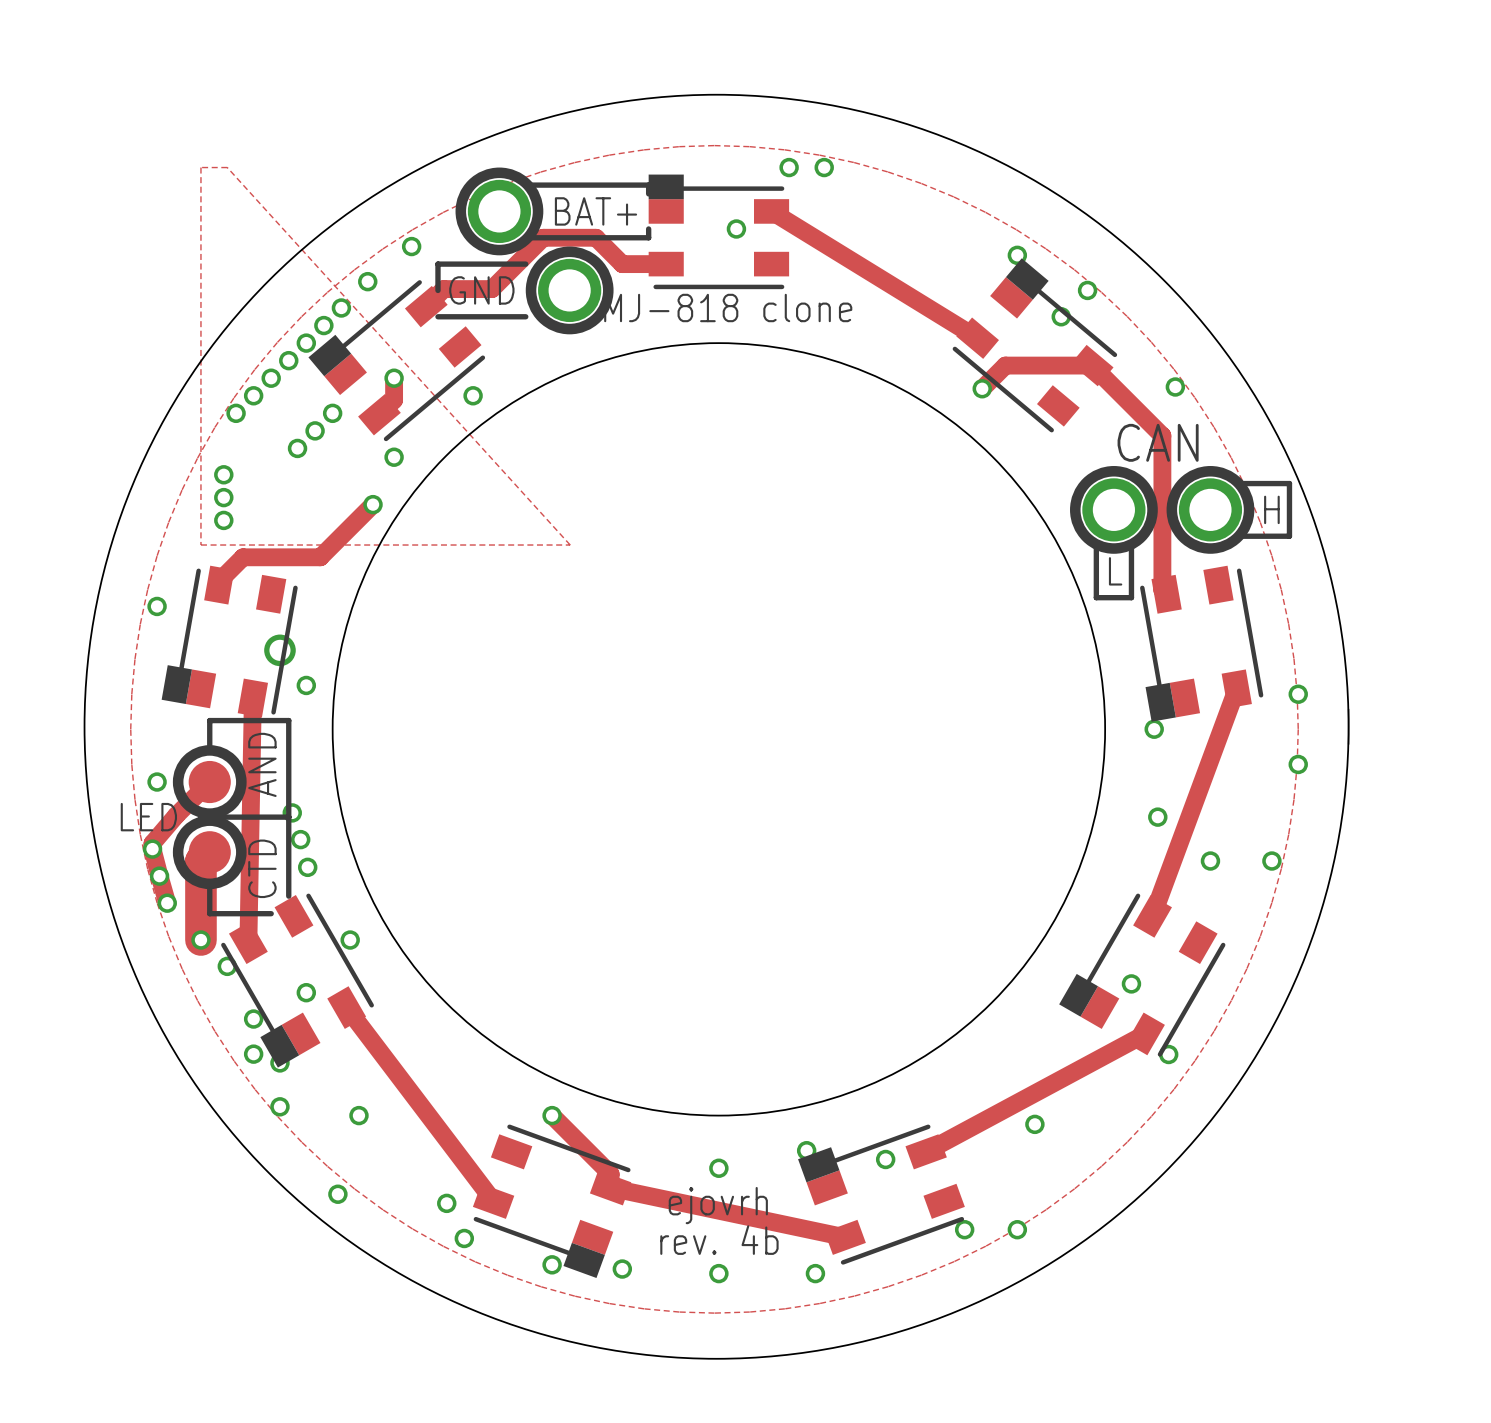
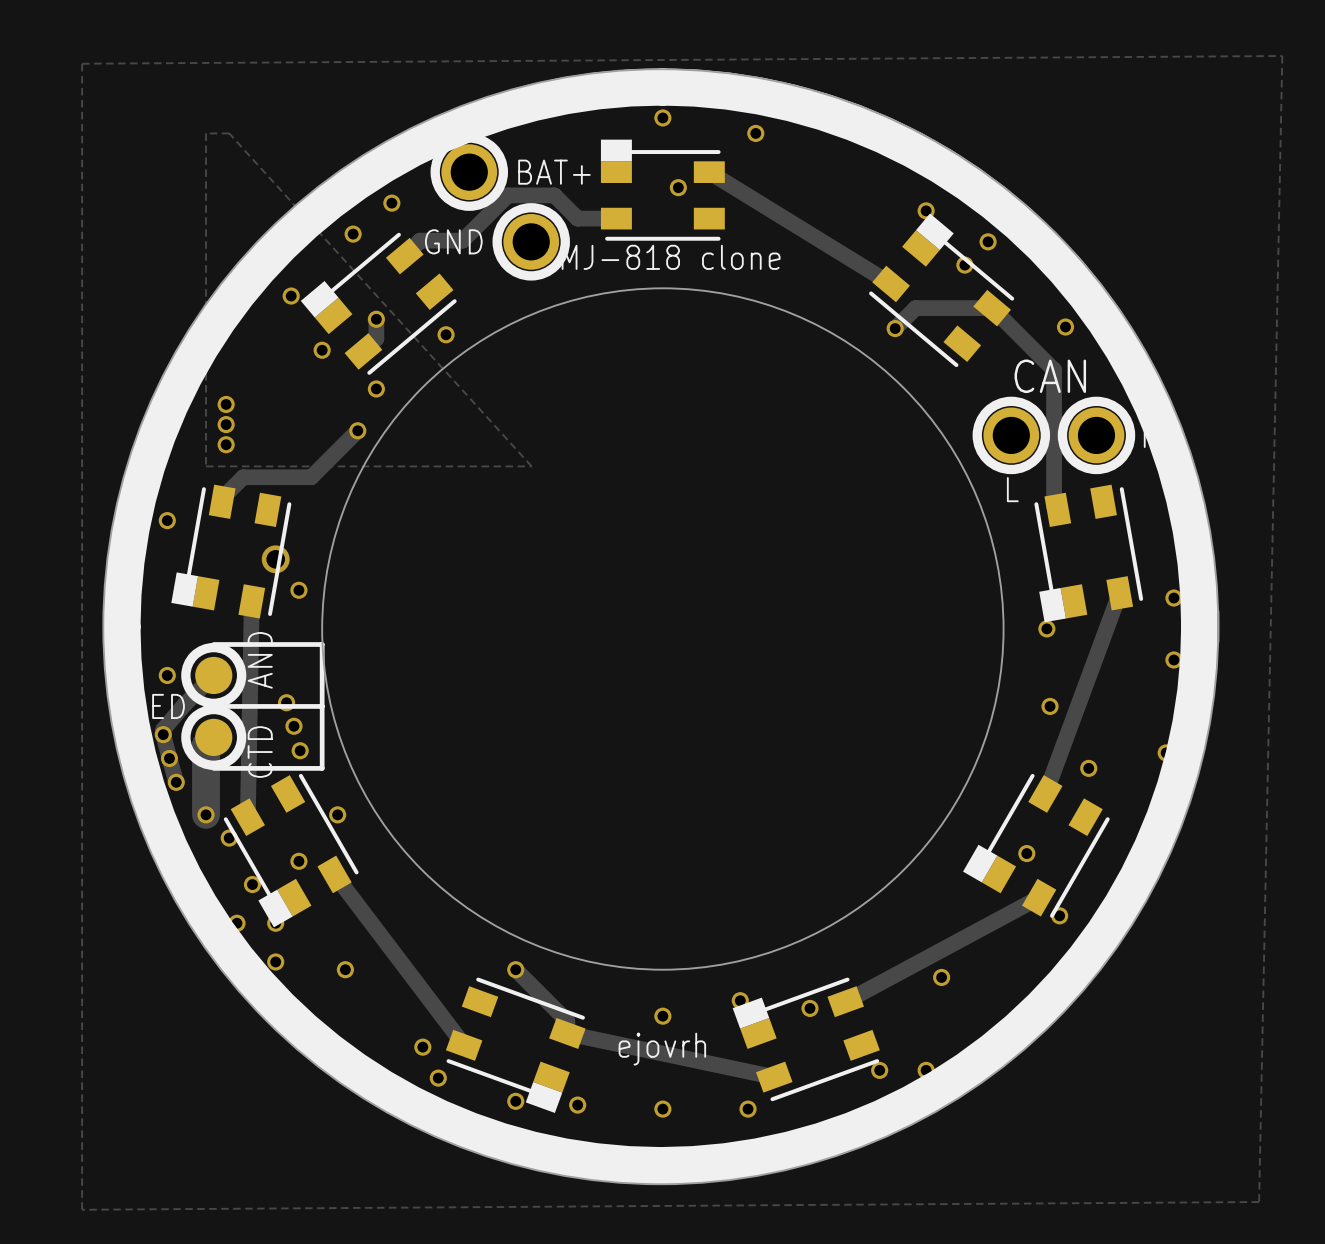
line: none -> (662, 86) (695, 88) (759, 96) (822, 111) (853, 122) (883, 134) (941, 165) (994, 202) (1043, 245) (1086, 294) (1105, 320) (1122, 348) (1152, 405) (1175, 466) (1184, 497) (1196, 561) (1199, 626) (1195, 691) (1190, 723) (1175, 787) (1164, 817) (1138, 877) (1104, 932) (1064, 984) (1041, 1007) (1018, 1030) (966, 1070) (911, 1103) (882, 1118) (821, 1141) (757, 1156) (725, 1161) (660, 1165) (595, 1161) (563, 1156) (500, 1141) (439, 1118) (410, 1103) (354, 1070) (303, 1030) (279, 1007) (257, 984) (217, 932) (183, 877) (156, 817) (146, 787) (130, 723) (125, 691) (121, 626) (122, 594) (130, 529) (146, 465) (169, 405) (200, 347) (217, 319) (237, 293) (280, 244) (329, 201) (383, 164) (441, 134) (471, 121) (502, 111) (565, 95) (630, 87) (662, 86)
zone outline: (714, 145) (784, 149) (819, 155) (888, 172) (921, 183) (985, 212) (1016, 229) (1074, 269) (1127, 316) (1151, 342) (1194, 397) (1231, 458) (1260, 522) (1271, 555) (1288, 624) (1297, 694) (1298, 729) (1293, 799) (1288, 834) (1271, 903) (1260, 936) (1231, 1000) (1214, 1031) (1174, 1089) (1127, 1142) (1101, 1166) (1046, 1209) (985, 1246) (921, 1275) (888, 1286) (819, 1303) (749, 1312) (714, 1313) (644, 1308) (609, 1303) (540, 1286) (507, 1275) (443, 1246) (412, 1228) (354, 1188) (301, 1142) (277, 1116) (234, 1060) (197, 1000) (168, 936) (157, 903) (140, 834) (131, 764) (130, 729) (135, 658) (140, 624) (157, 555) (168, 522) (197, 458) (214, 427) (254, 369) (301, 316) (327, 292) (382, 248) (443, 212) (507, 183) (540, 172) (609, 155) (679, 146) (714, 145) -> (1282, 56) (82, 63) (82, 1209) (1259, 1202) (1282, 56)
via position: (789, 167) -> (662, 117)
line: (525, 185) (648, 185) (648, 193) -> none
line: (648, 228) (648, 237) (525, 237) -> none
line: (525, 264) (437, 264) (437, 290) -> none
via: (341, 307) -> none
line: (437, 316) (525, 316) -> none
via: (323, 325) -> none
via: (306, 343) -> none
via: none -> (291, 296)
via: (288, 360) -> none
via: (271, 378) -> none
via: (253, 395) -> none
via: (236, 413) -> none
via: (315, 430) -> none
via: (297, 448) -> none
line: (1236, 483) (1289, 483) (1289, 536) (1236, 536) -> none
line: (1096, 545) (1096, 597) (1131, 597) (1131, 545) -> none
line: (209, 746) (209, 720) (288, 720) (288, 896) -> (213, 644) (322, 644) (322, 768) (213, 768)
line: none -> (283, 706) (322, 706)
via position: (1210, 861) -> (1088, 768)
via position: (1271, 861) -> (1166, 752)
line: (209, 887) (209, 913) (271, 913) -> none
via position: (253, 1054) -> (236, 923)
text: rev. 4b (719, 1240) -> none

